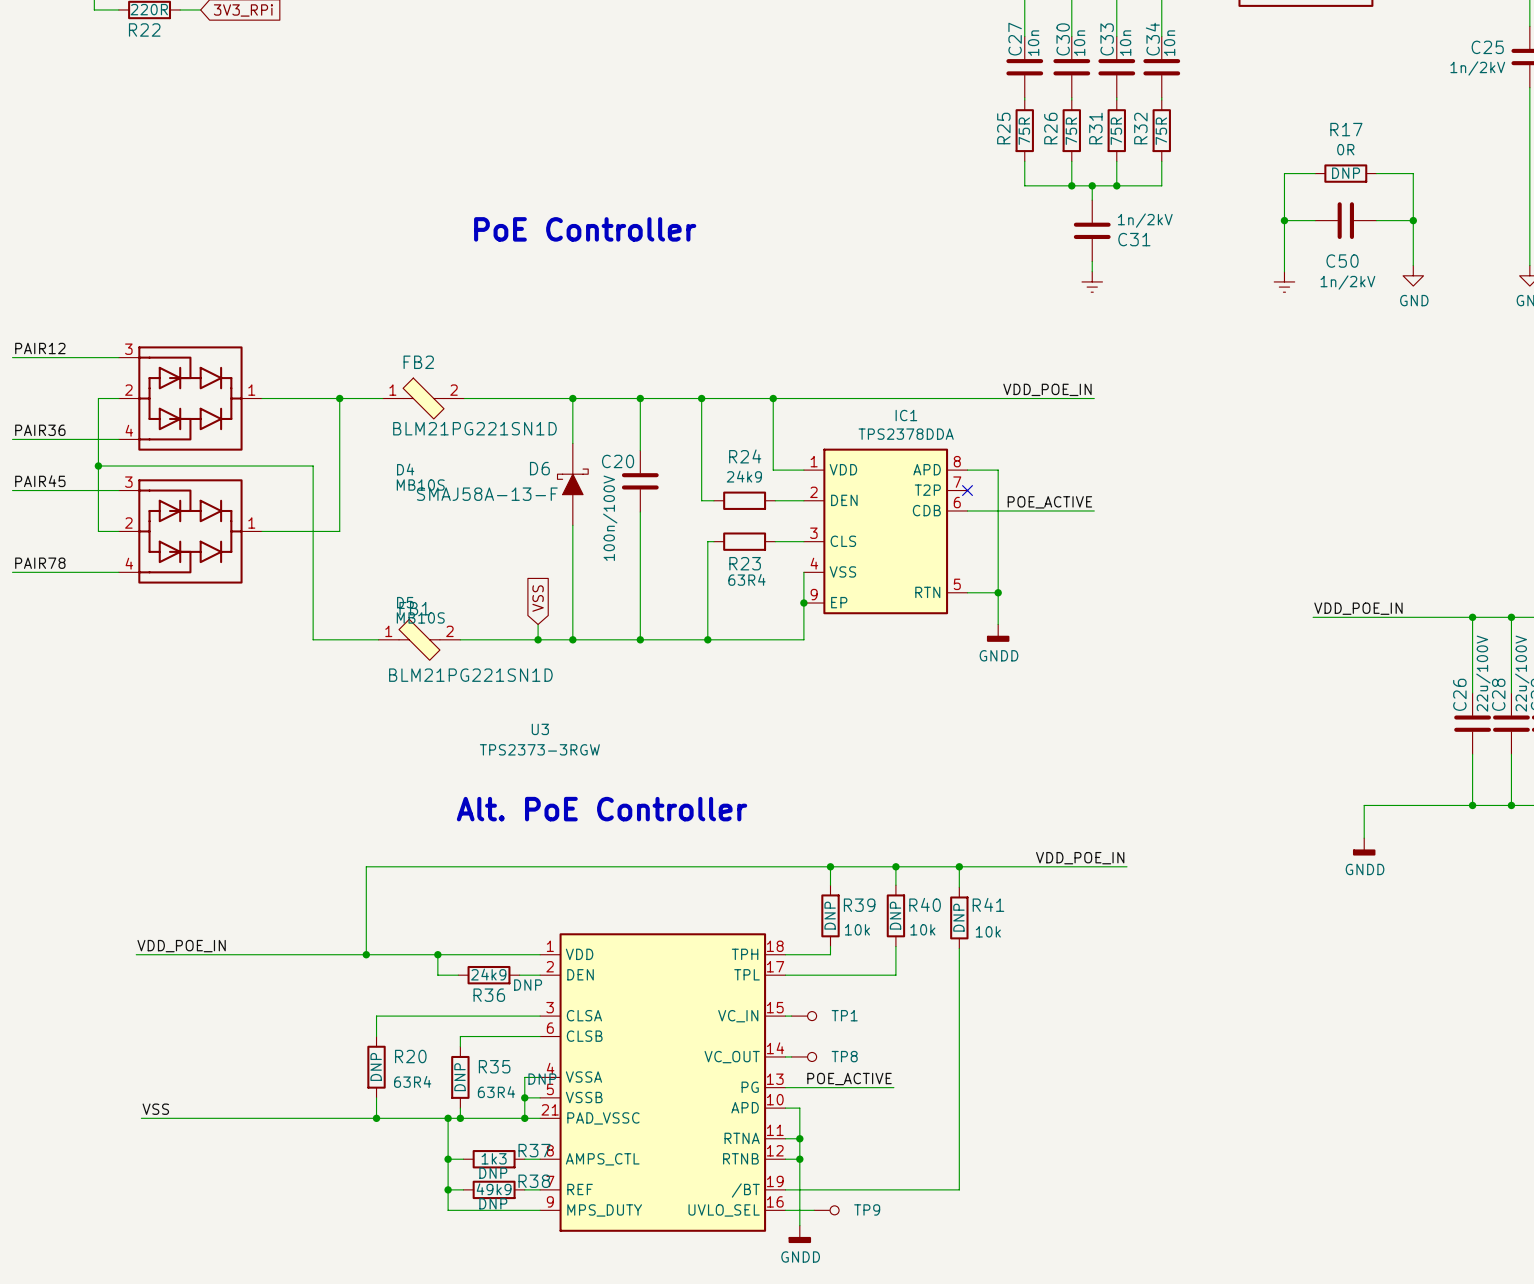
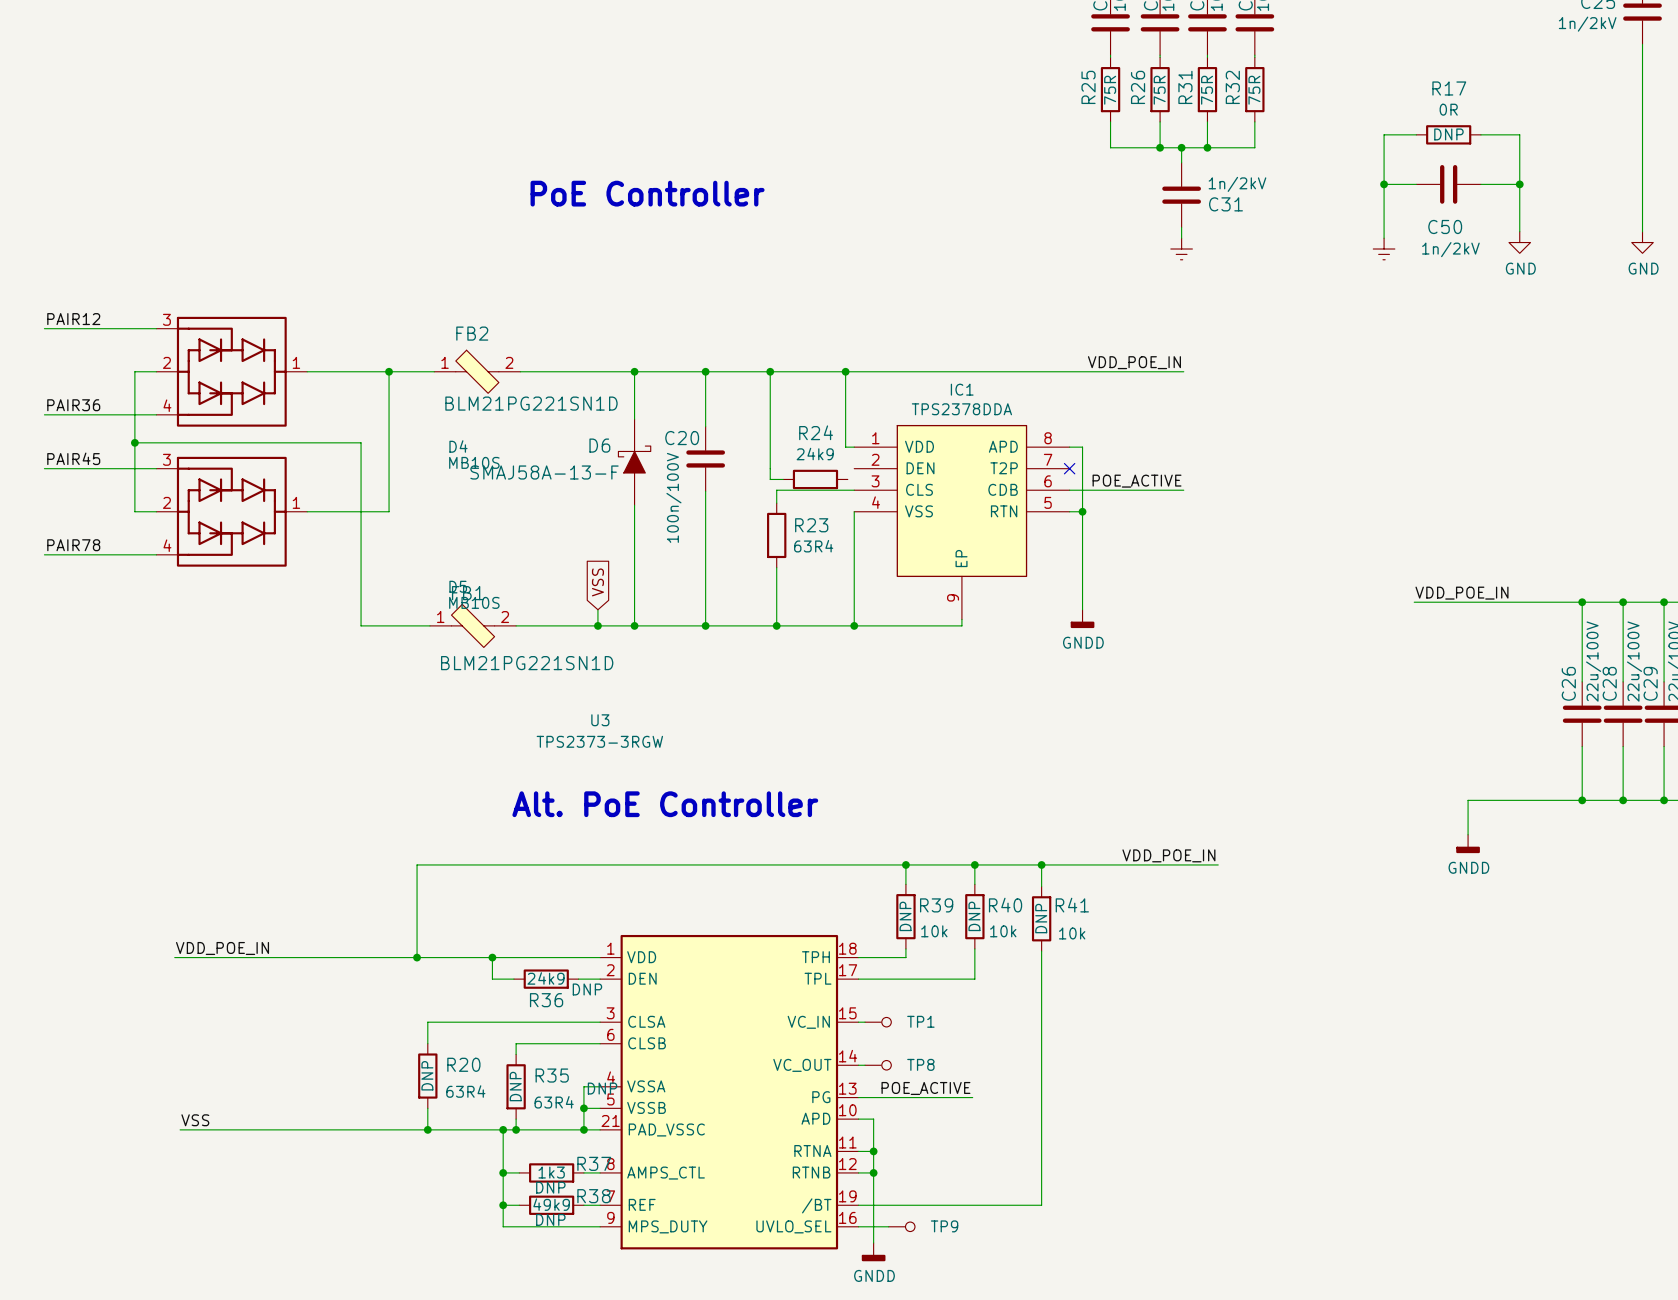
IC1 name position: IC1 (906, 415) -> IC1 (962, 389)
IC1 value position: TPS2378DDA (906, 434) -> TPS2378DDA (961, 409)
IC1 symbol: [803, 448, 968, 615] -> [854, 424, 1070, 620]
no-connect mark position: (967, 490) -> (1069, 468)
wire: (775, 500) (803, 500) -> none
wire: none -> (854, 490) (776, 490) (776, 503)
wire: none -> (854, 511) (854, 625)
wire: none -> (1069, 511) (1082, 511)
junction: none -> (1082, 511)
wire: (713, 541) (707, 541) (707, 584) -> none
R23 rotation: 0° (744, 541) -> 90° clockwise (776, 535)
R23 position: (744, 541) -> (776, 535)
wire: (775, 541) (803, 541) -> none
R23 name position: R23 (745, 563) -> R23 (811, 525)
wire: (803, 572) (803, 639) -> (961, 619) (961, 625) (877, 625)
R23 text position: 63R4 (746, 579) -> 63R4 (813, 546)
wire: (967, 592) (998, 592) -> none
junction: (998, 592) -> none
junction position: (803, 603) -> (854, 625)

